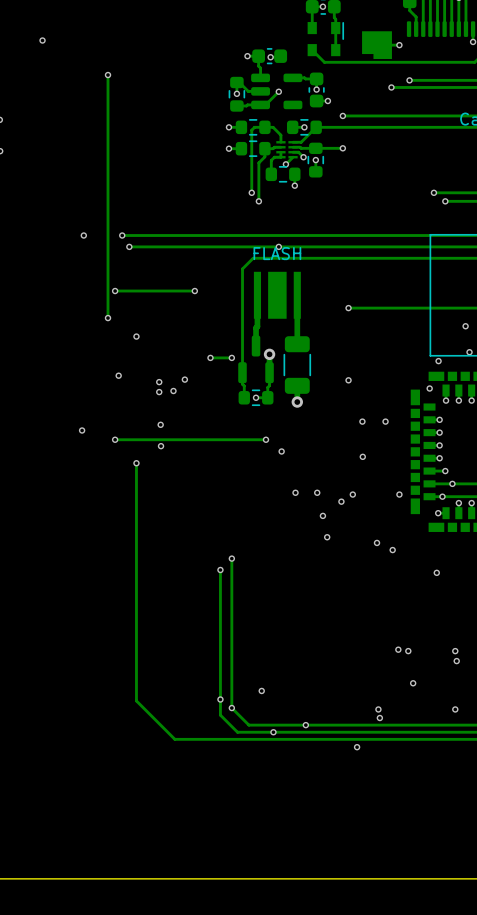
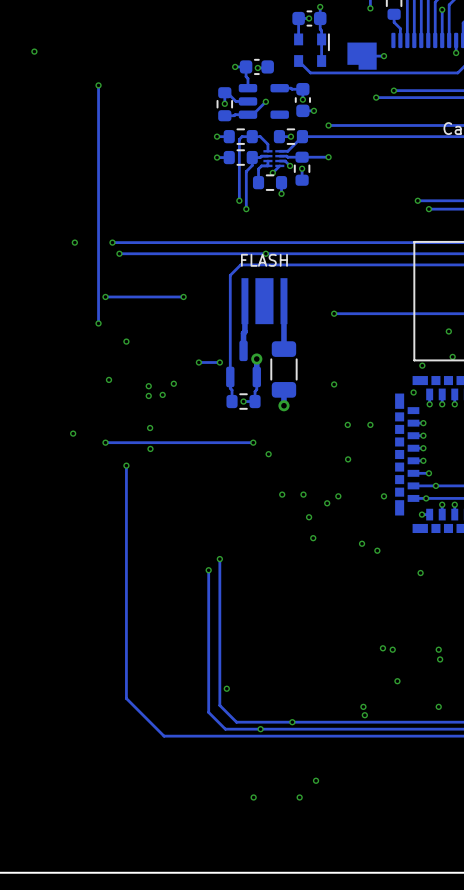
via: none -> (226, 688)
via: (261, 690) -> none
via: (220, 699) -> none
via: (231, 708) -> none
via: (357, 747) -> none
via: none -> (316, 780)
via: none -> (253, 797)
via: none -> (299, 797)

